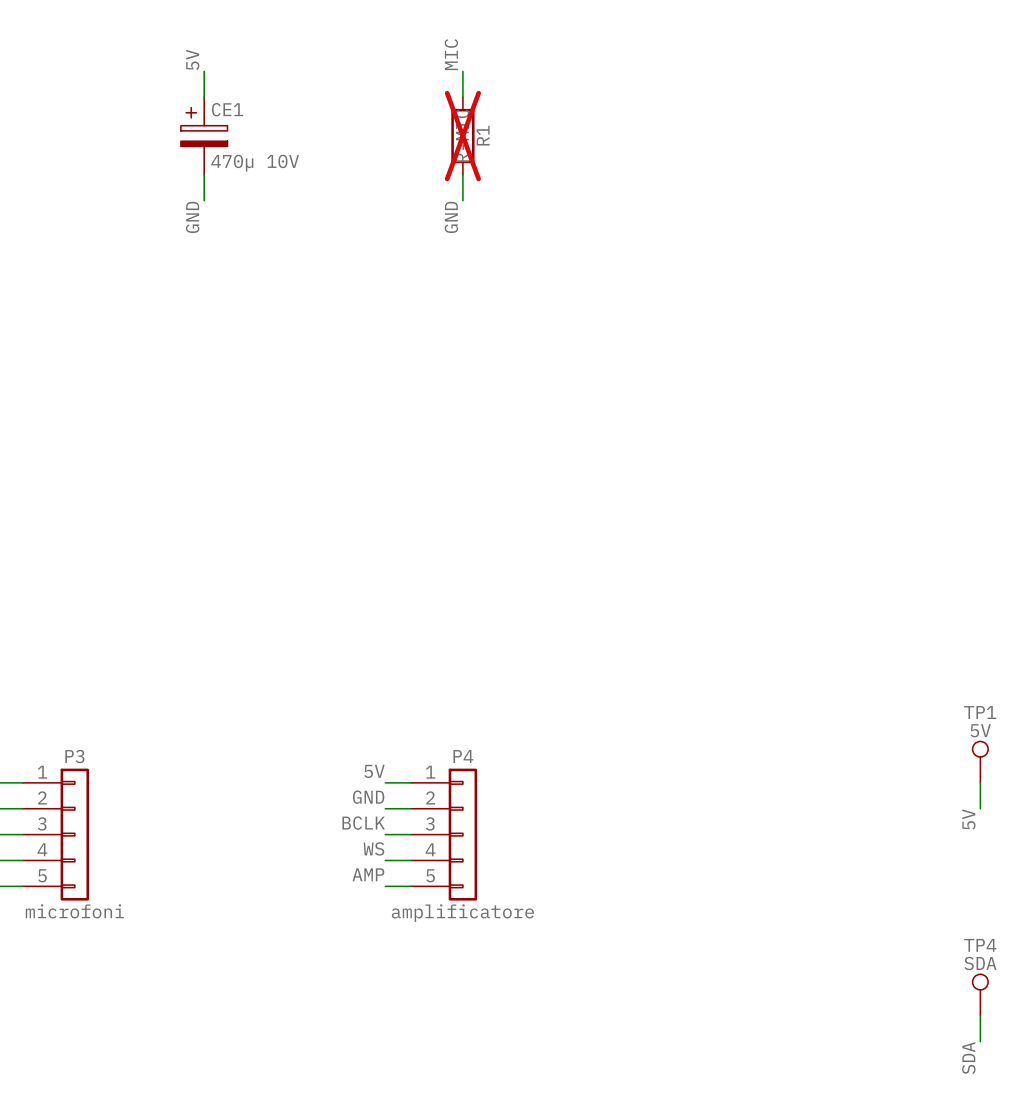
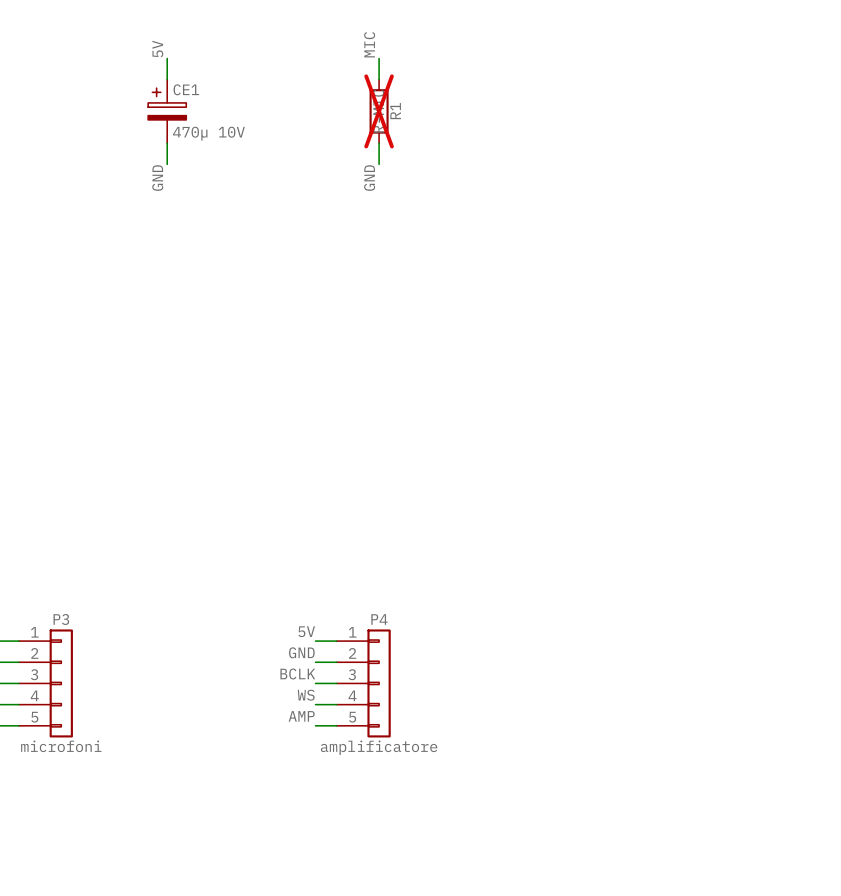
TP1: 5V (980, 762) -> none
wire: (980, 782) (980, 808) -> none
label: 5V (968, 819) -> none
TP4: SDA (980, 995) -> none
wire: (980, 1015) (980, 1041) -> none
label: SDA (968, 1058) -> none

